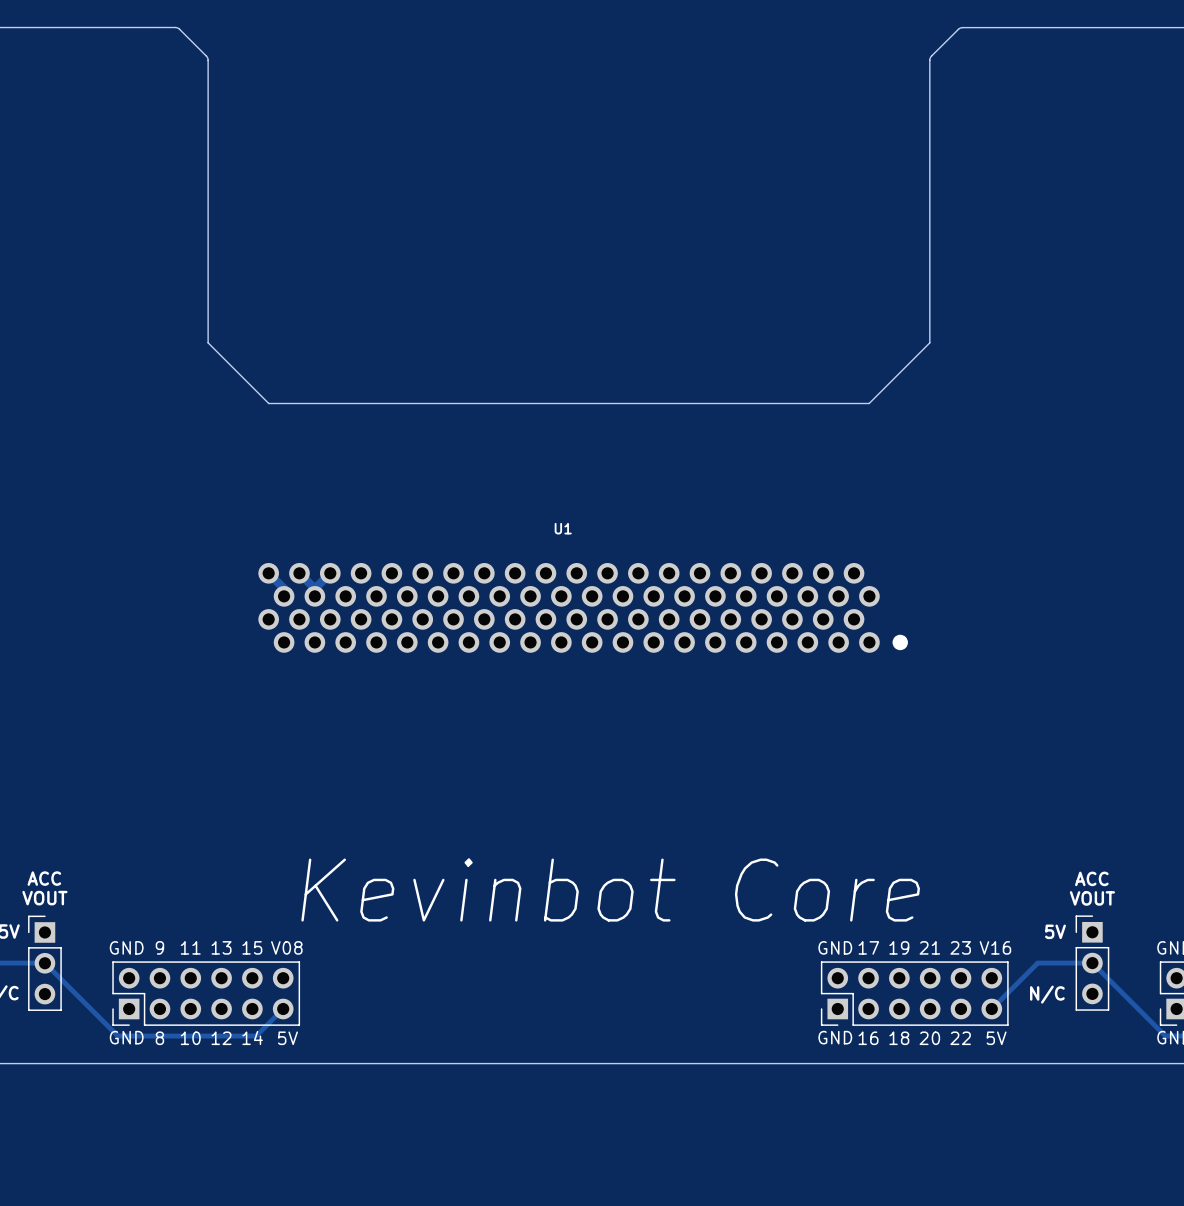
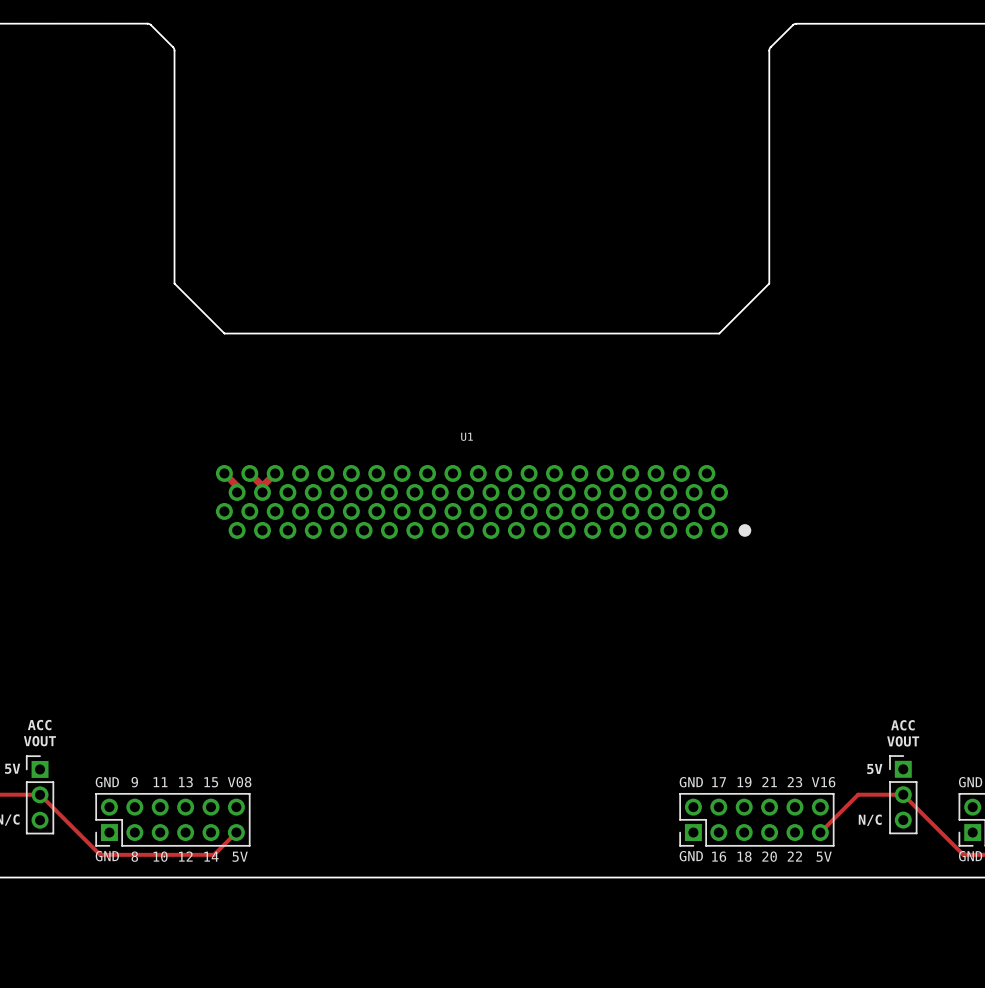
text: Kevinbot Core (610, 890) -> none

